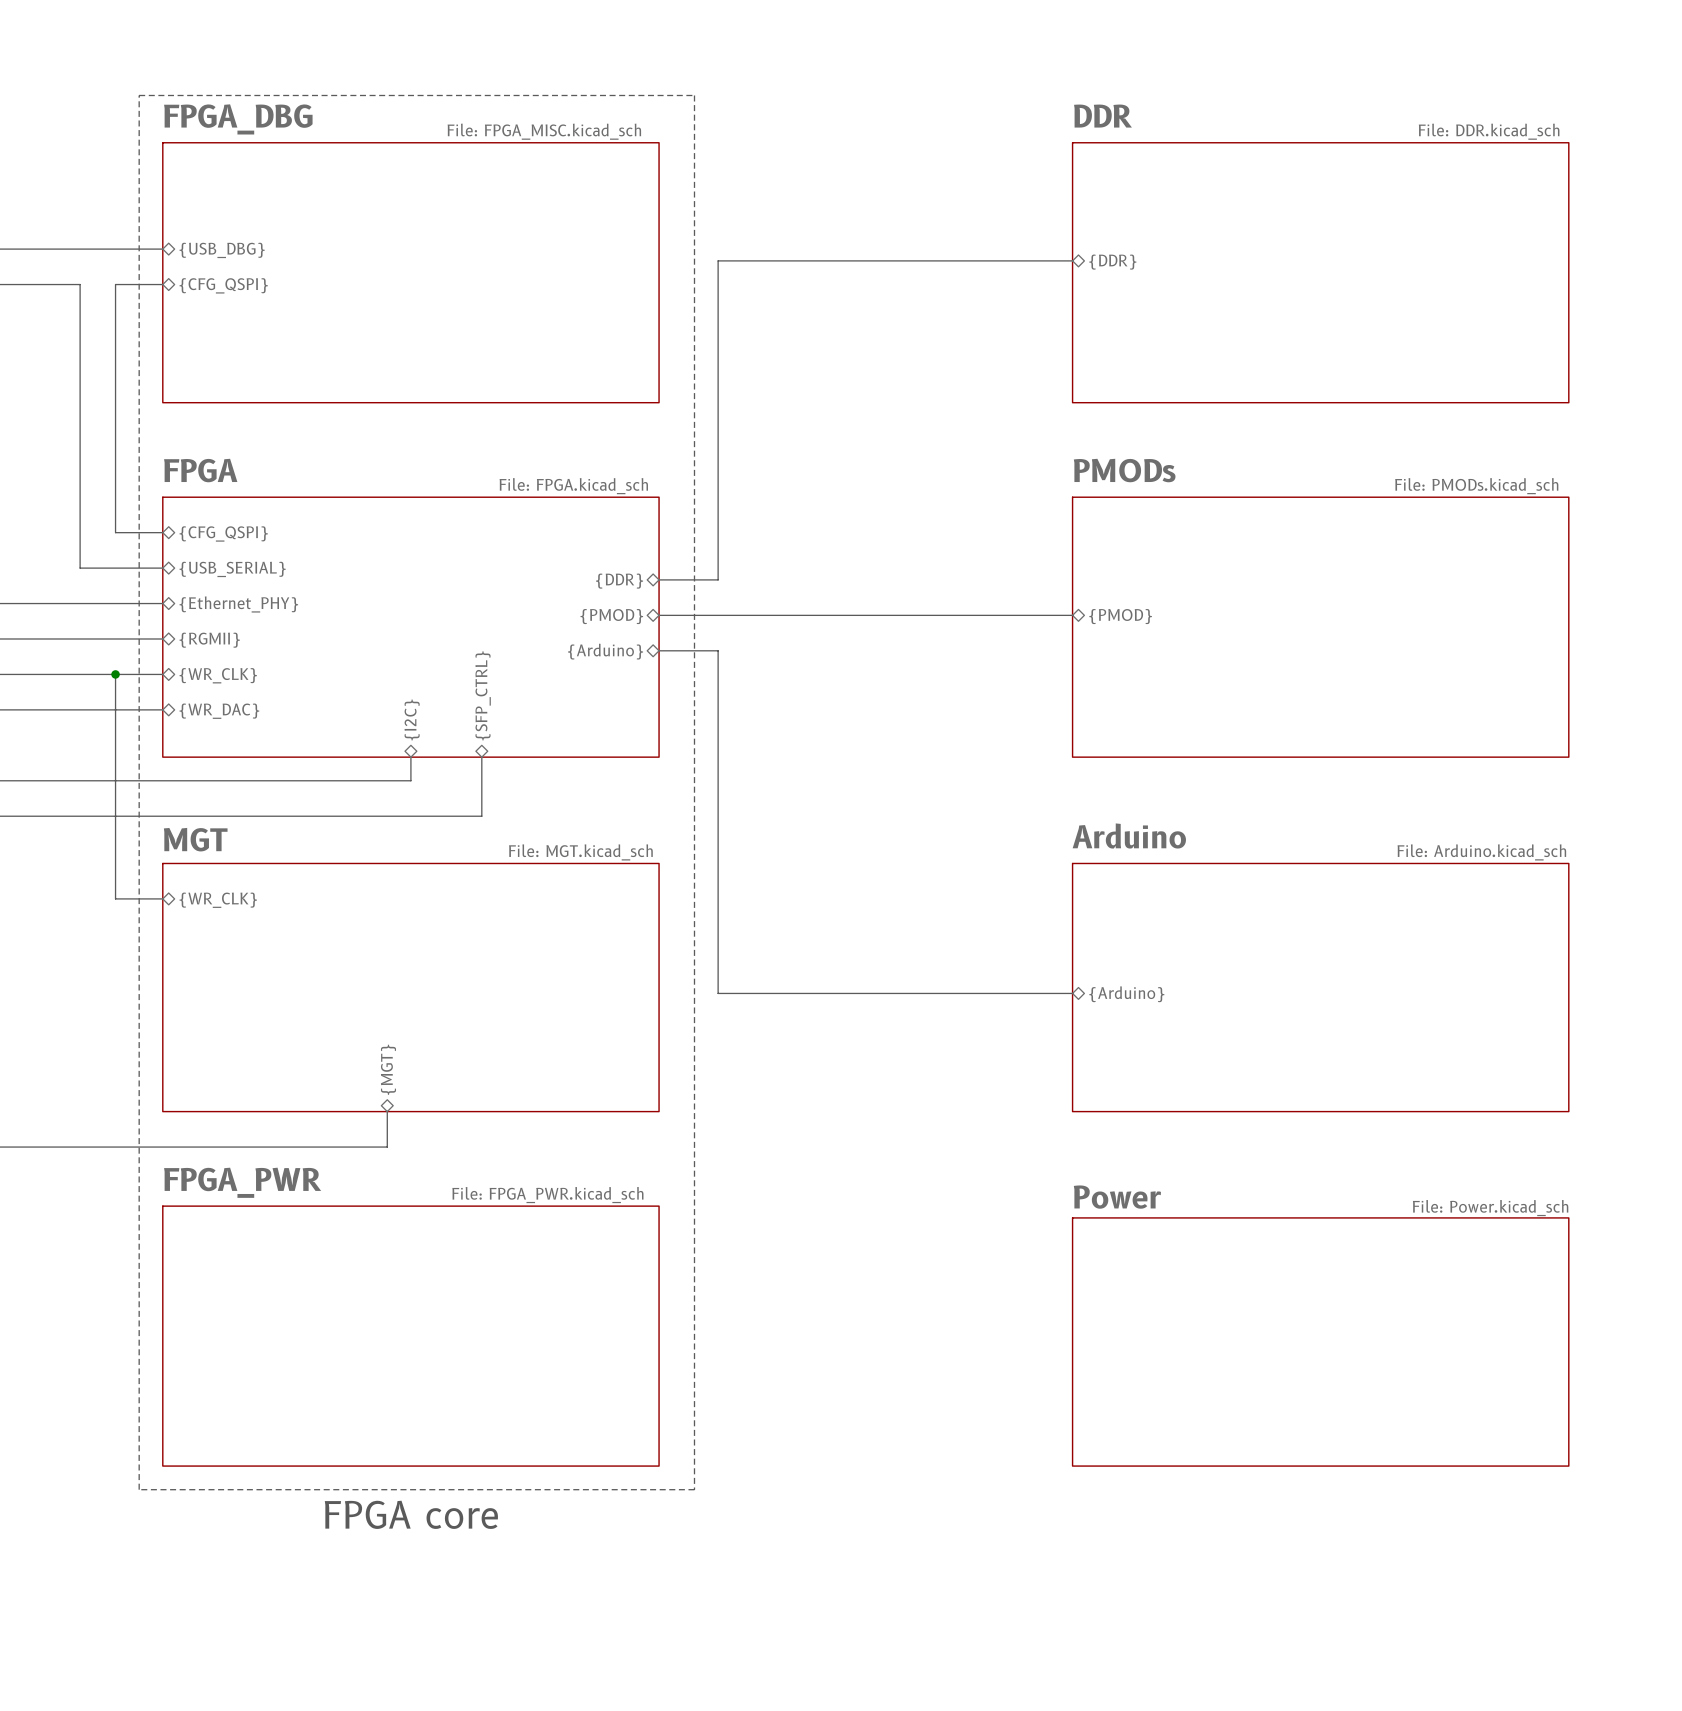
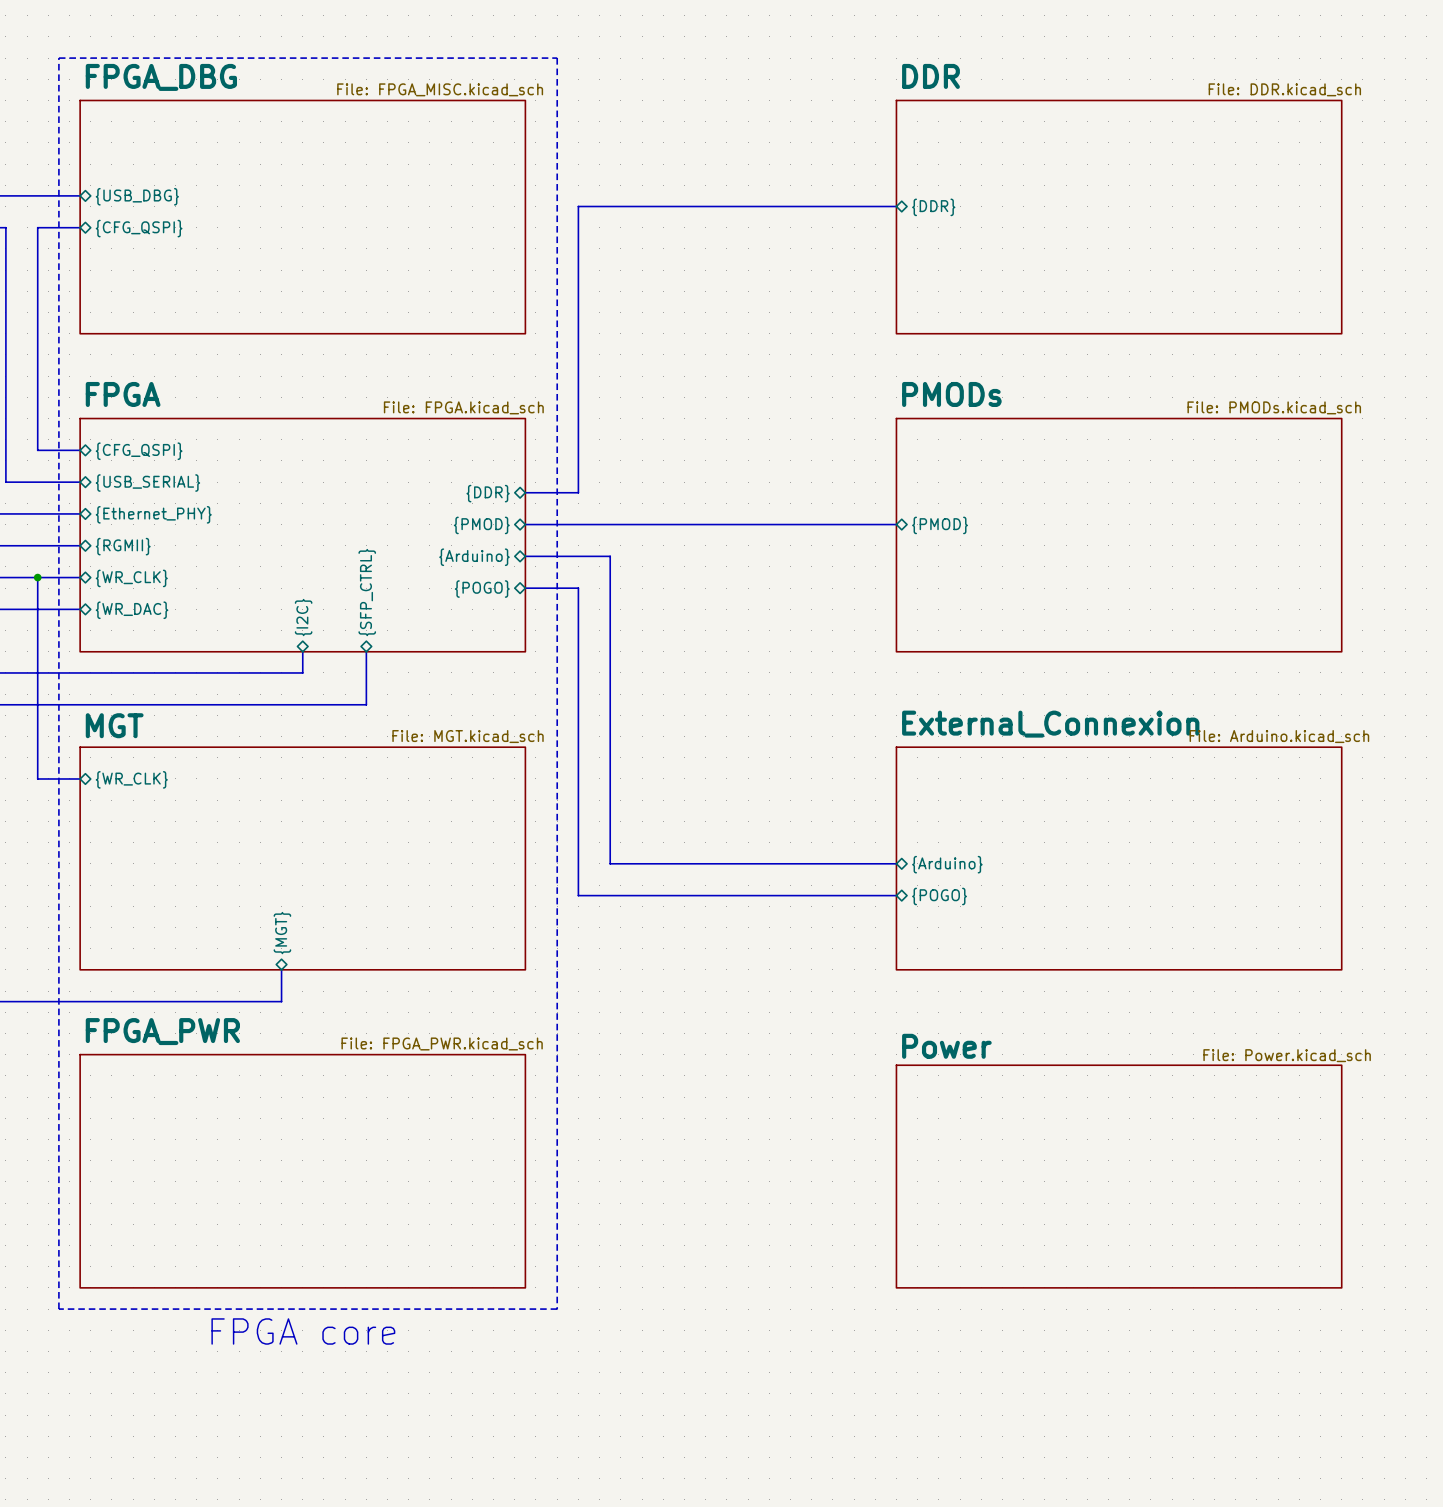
bus: (718, 650) (718, 686) -> (525, 588) (578, 588)
bus: none -> (578, 556) (610, 556) (610, 863)
sheet pin: none -> {POGO} (482, 589)
sheet Arduino name: Arduino (1129, 835) -> External_Connexion (1050, 724)
bus: (718, 993) (753, 993) -> (578, 863) (578, 895) (896, 895)
sheet pin: none -> {POGO} (939, 896)

